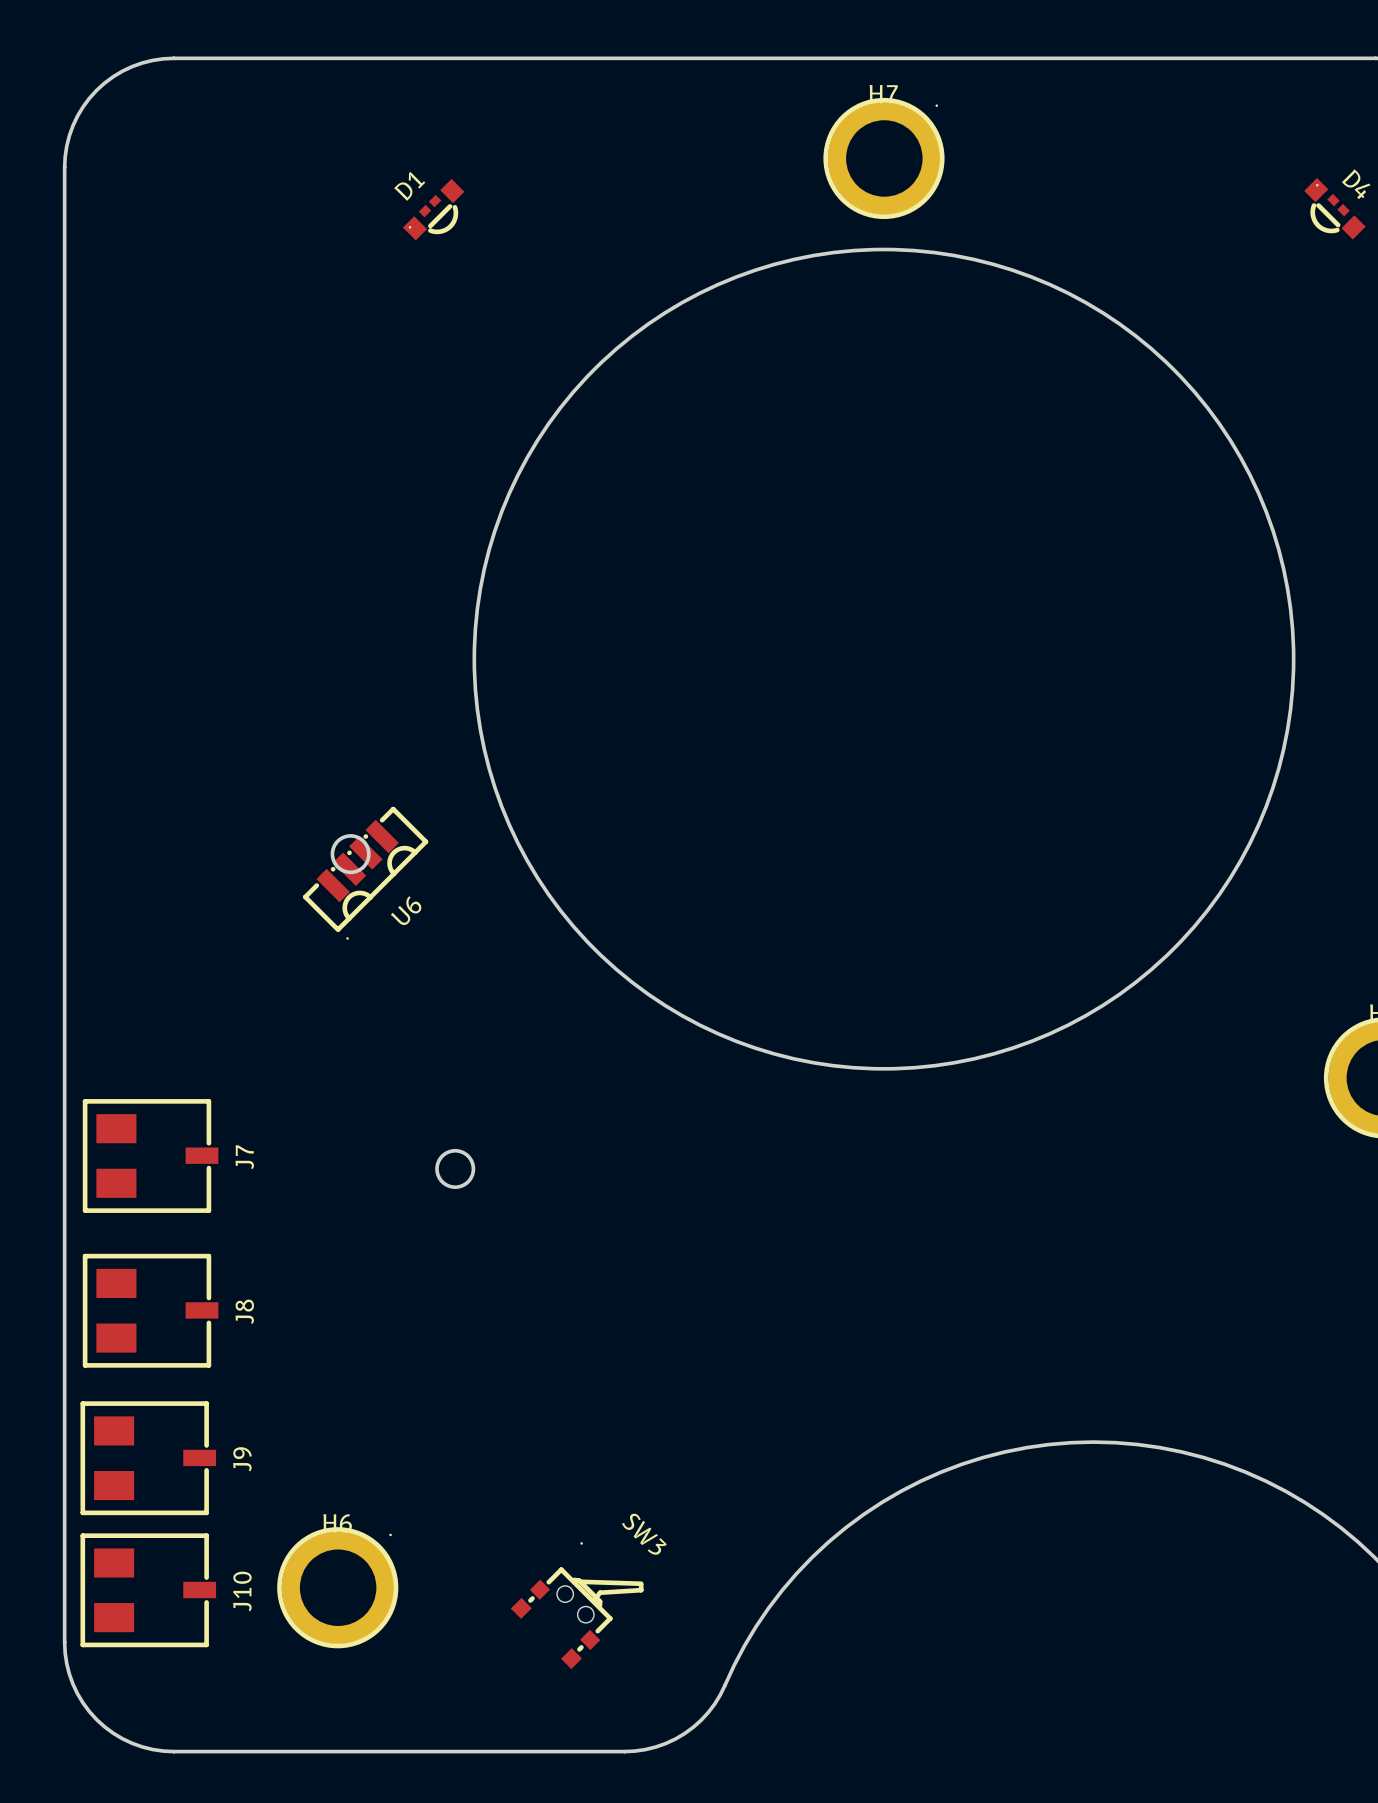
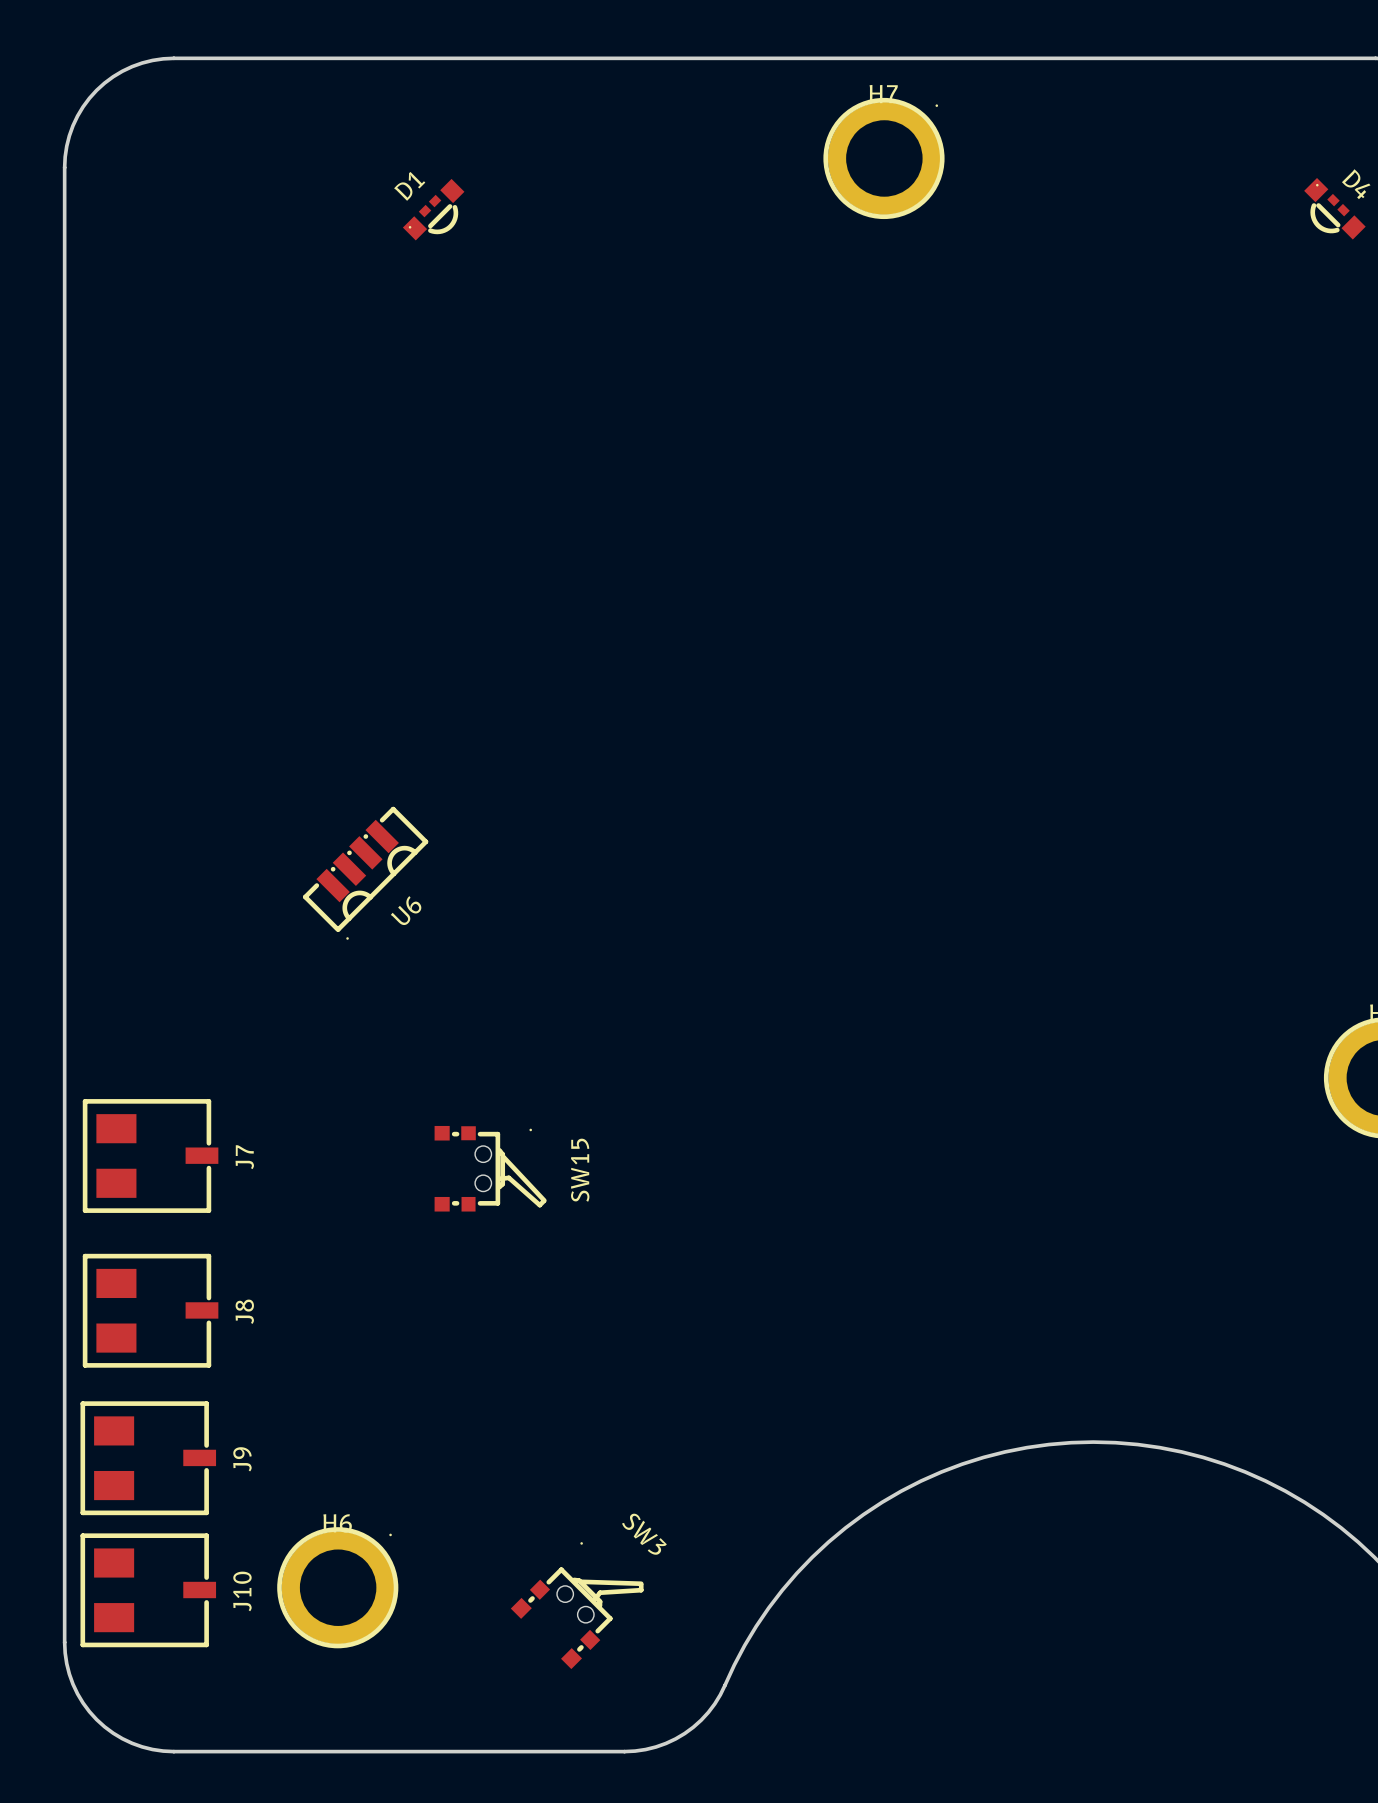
round board edge: [472, 247, 1296, 1071] -> none
round board edge: [330, 834, 371, 875] -> none
round board edge: [435, 1148, 476, 1190] -> none
SW15: none -> (490, 1168)

